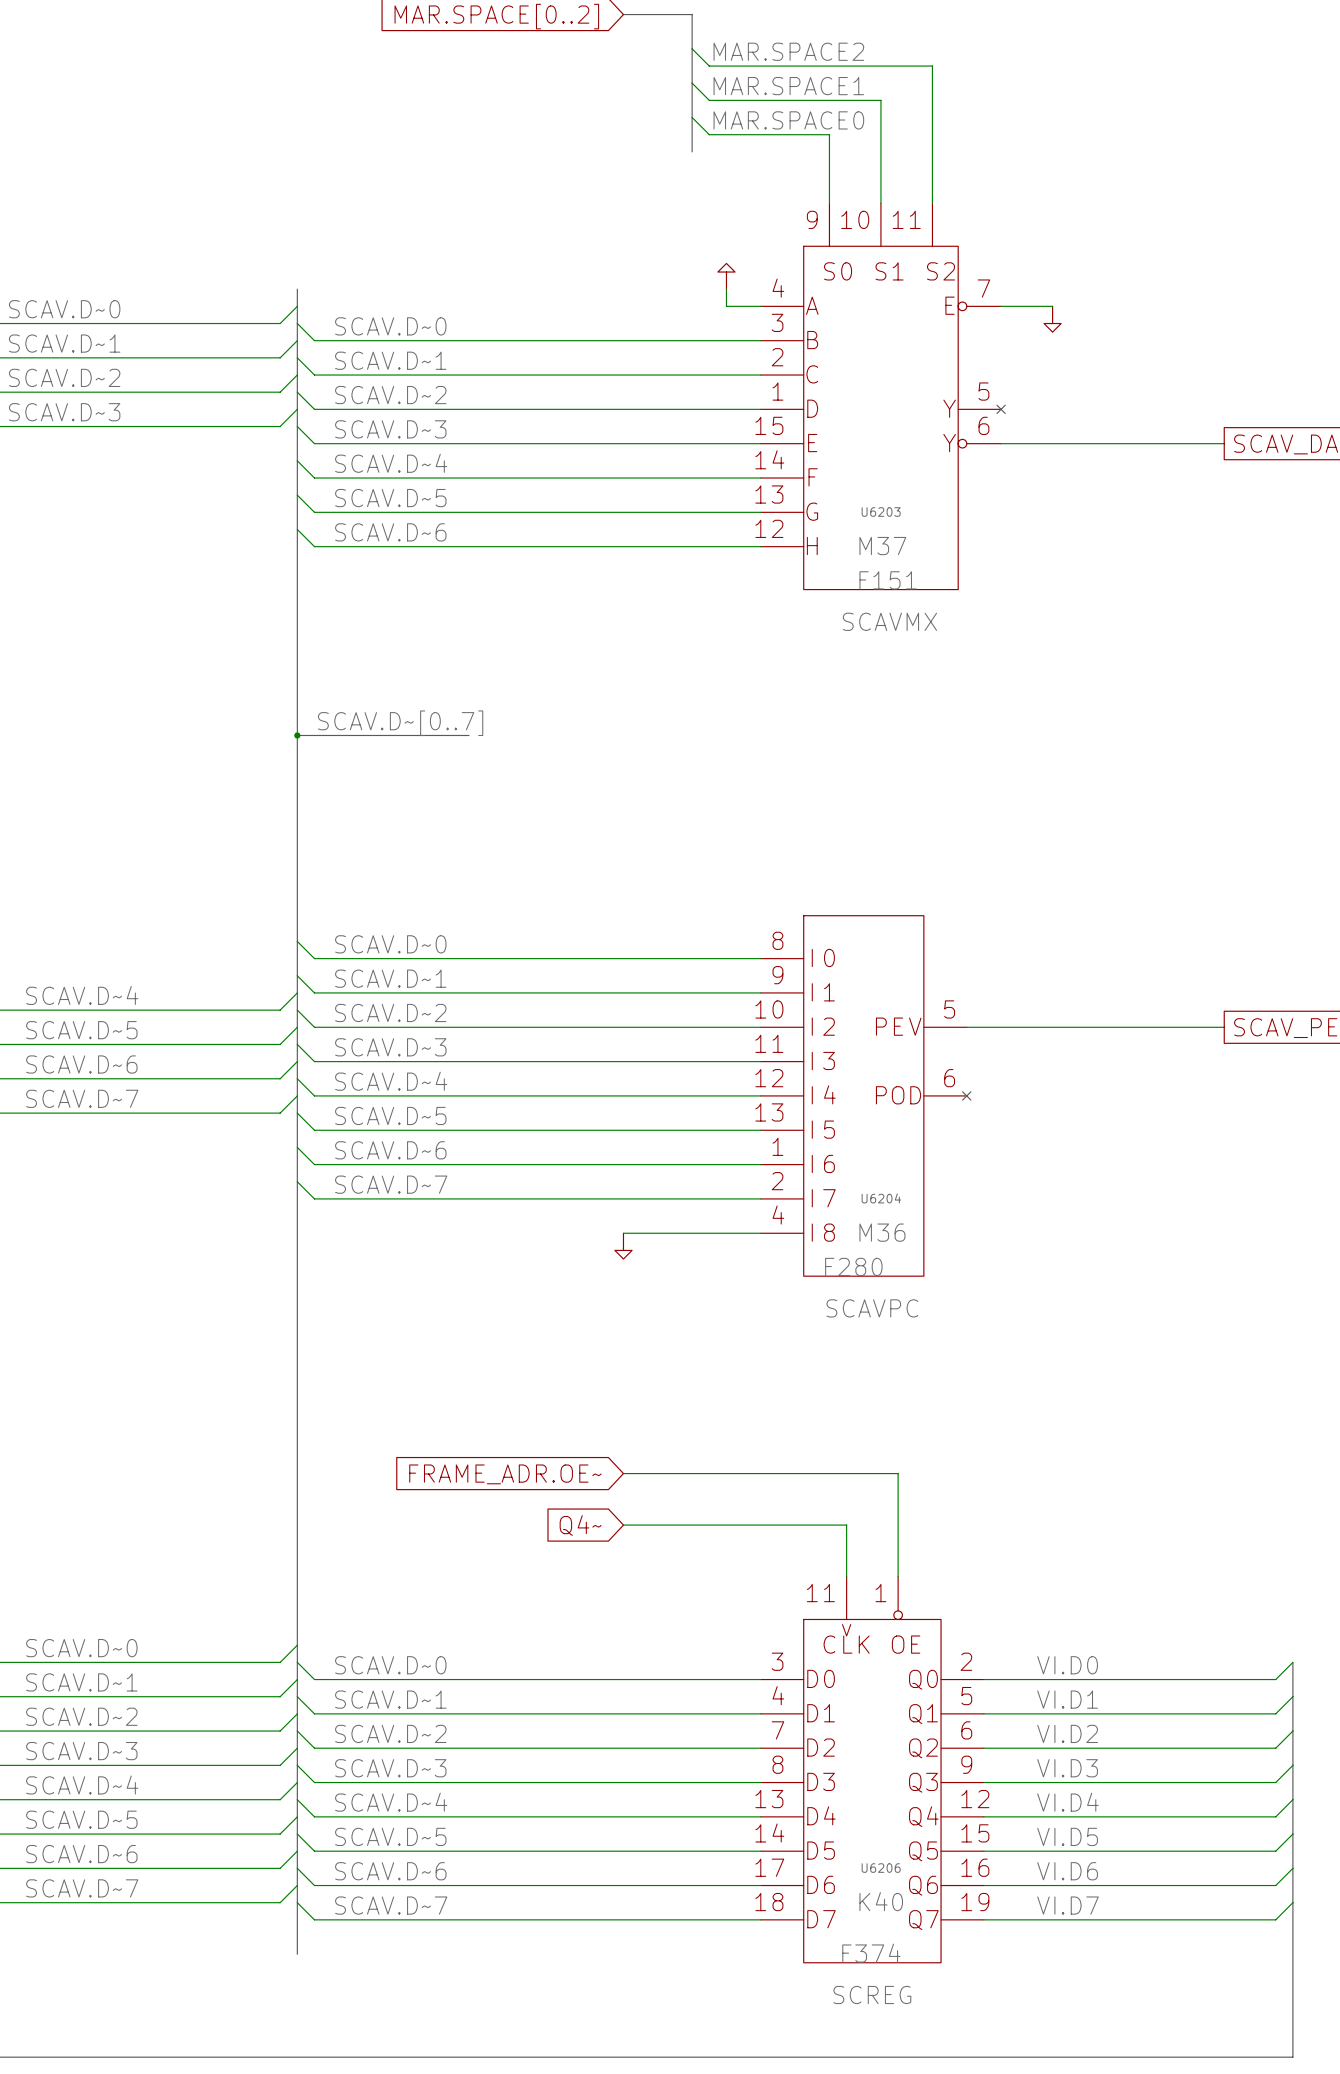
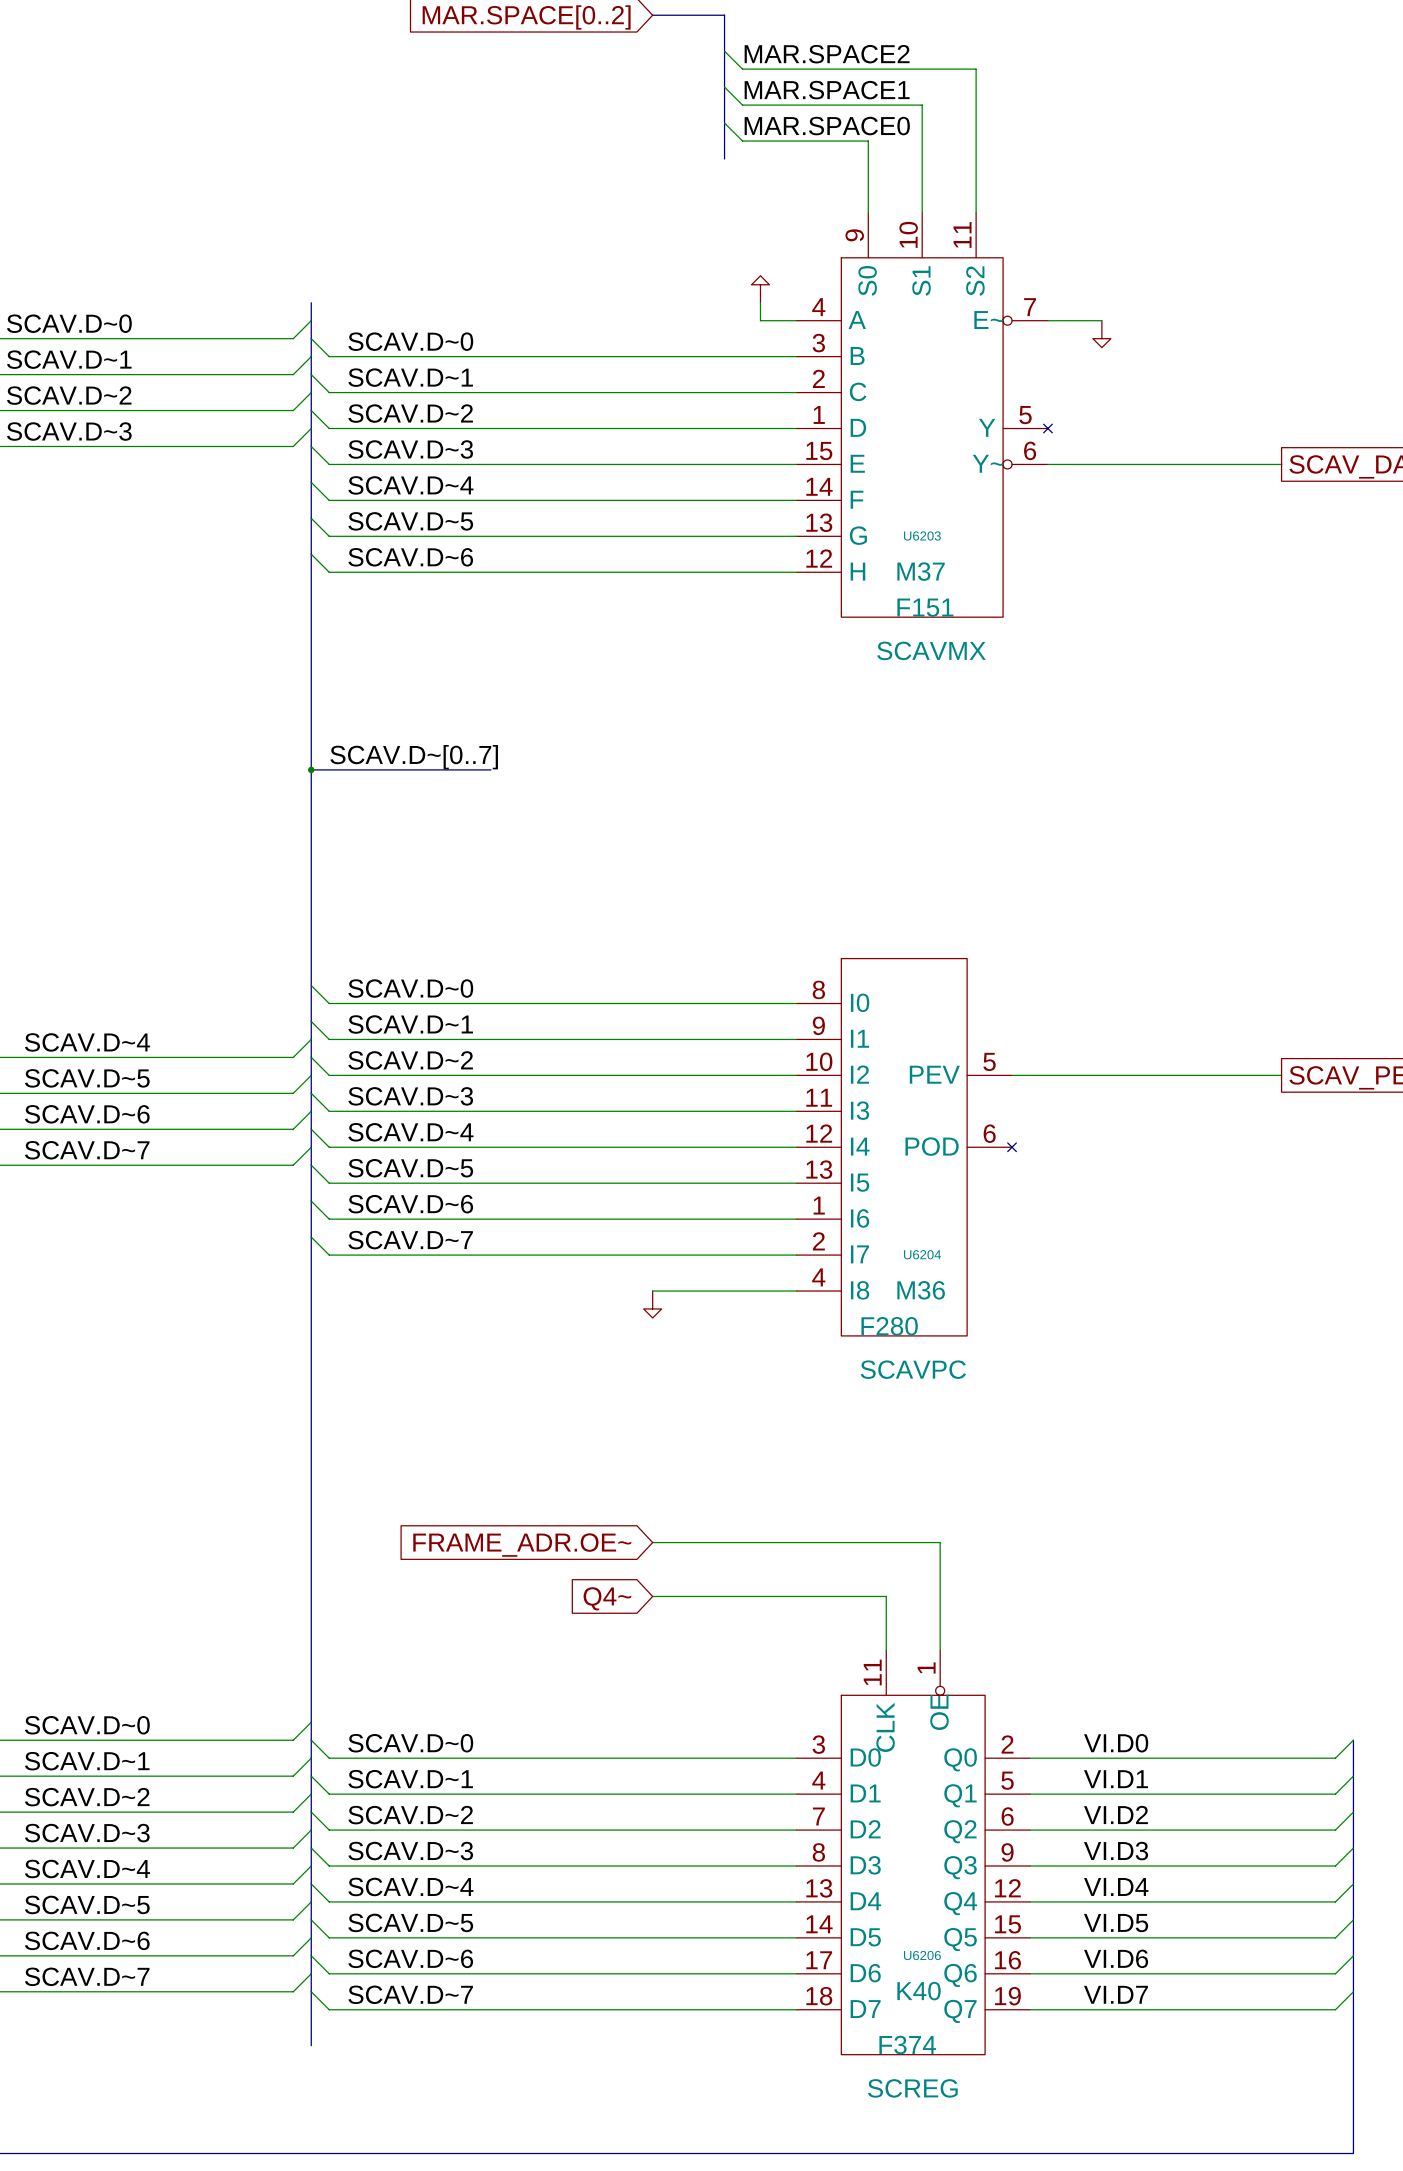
U6203 symbol: [760, 203, 1002, 590] -> [796, 212, 1048, 618]
U6204 symbol: [760, 915, 967, 1277] -> [796, 958, 1013, 1336]
U6206 symbol: [760, 1576, 984, 1963] -> [796, 1650, 1031, 2055]

